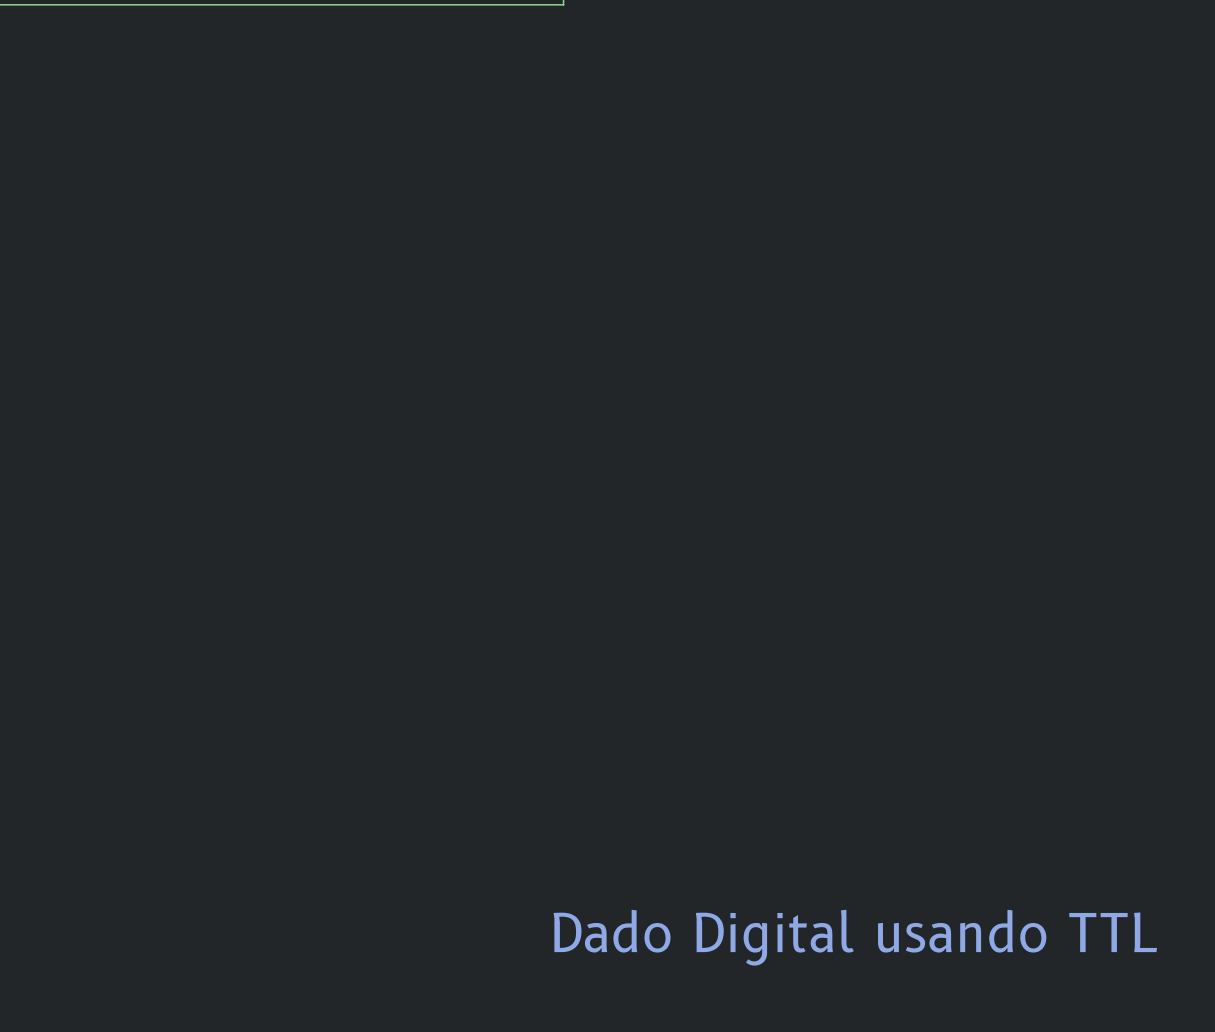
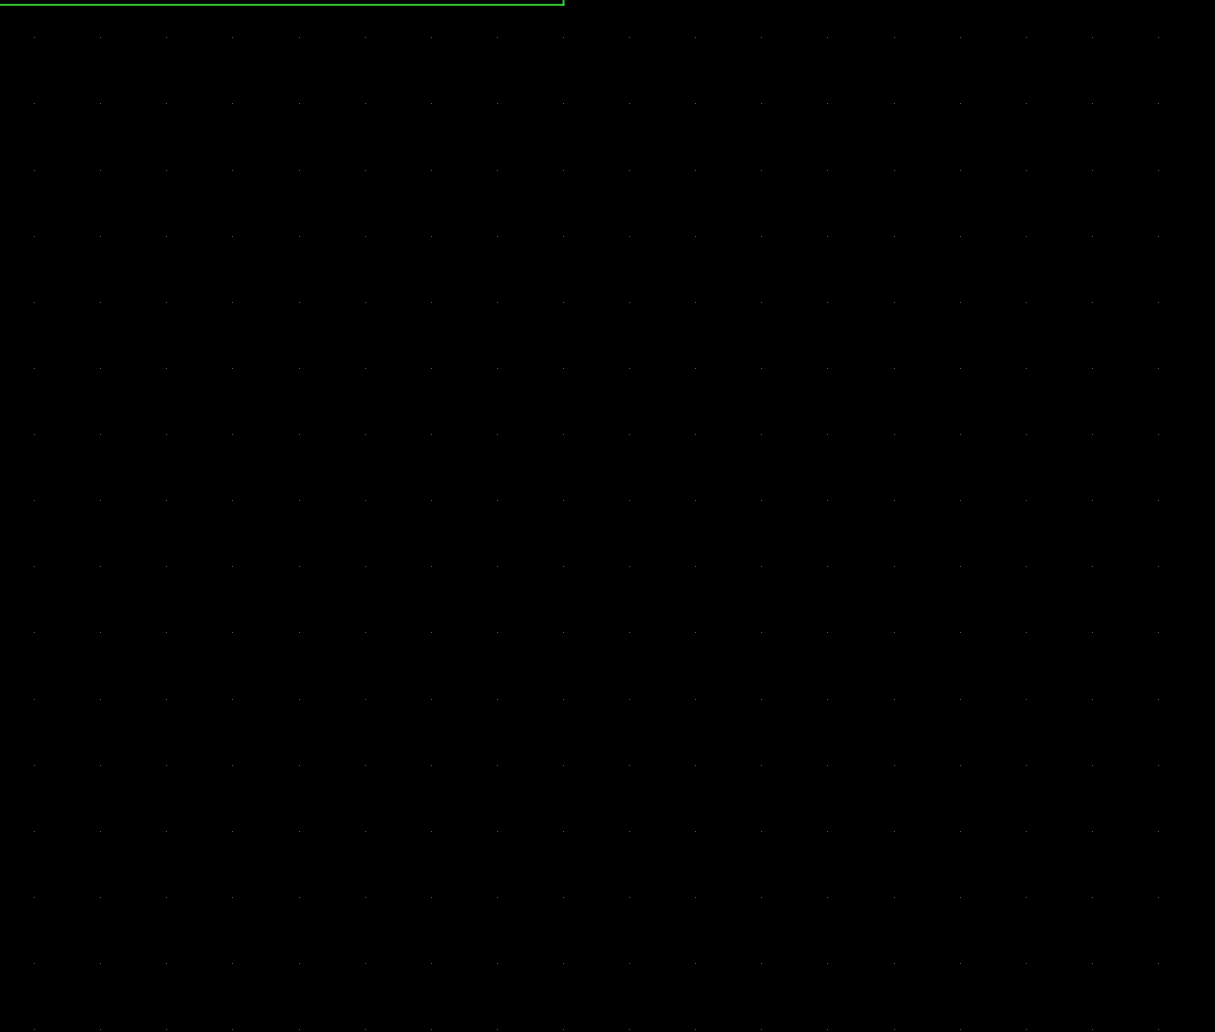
text: Dado Digital usando TTL (855, 937) -> none

